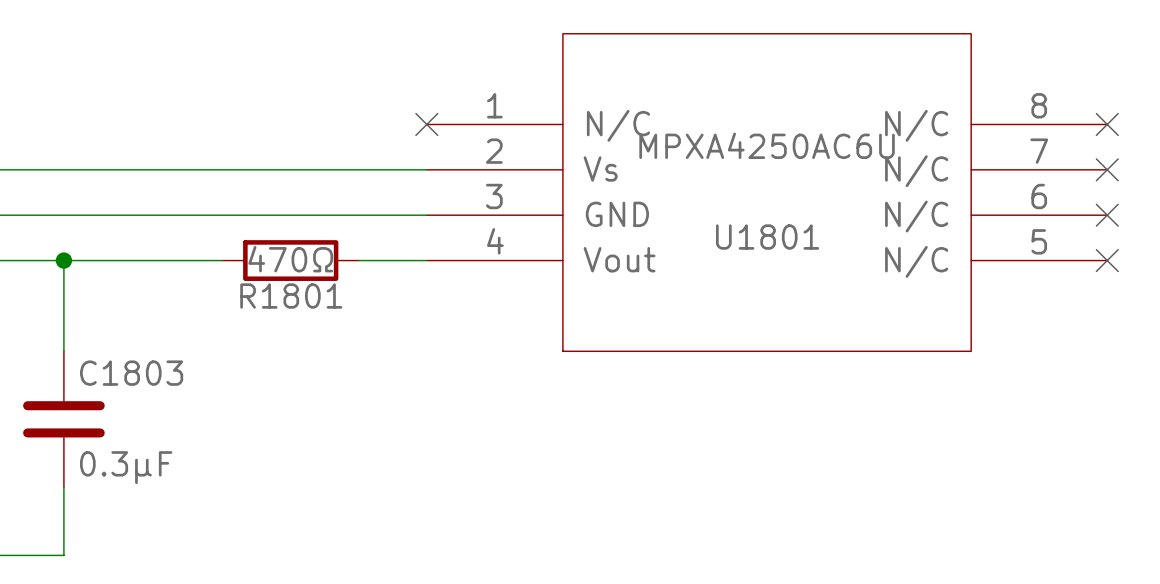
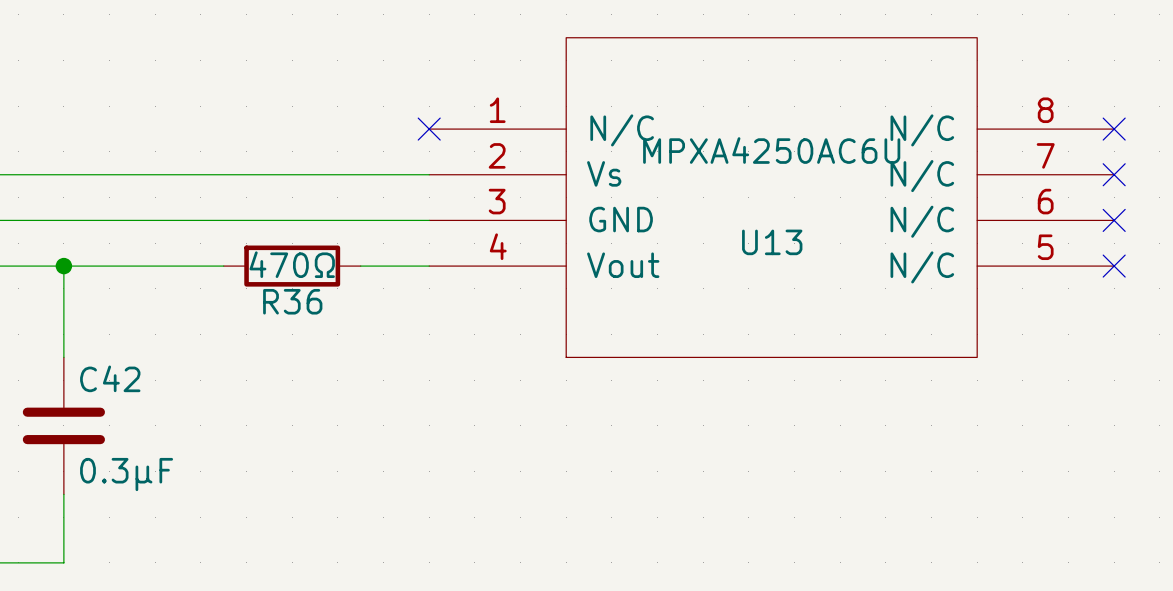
U1801 name: U1801 (767, 237) -> U13 (772, 242)
R1801 name: R1801 (291, 296) -> R36 (292, 301)
C1803 name: C1803 (131, 373) -> C42 (110, 378)

